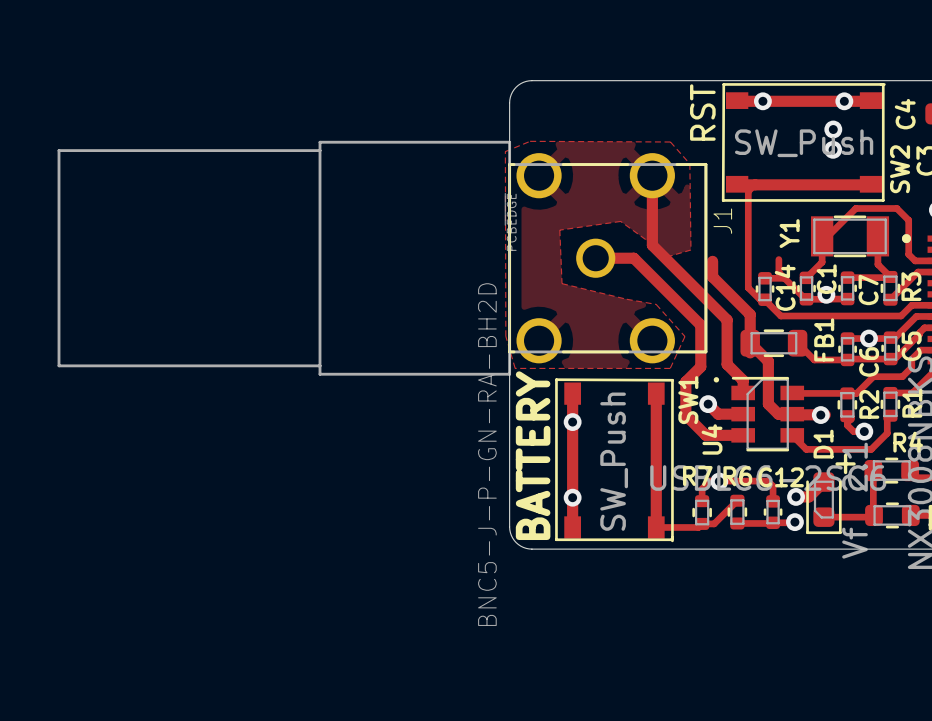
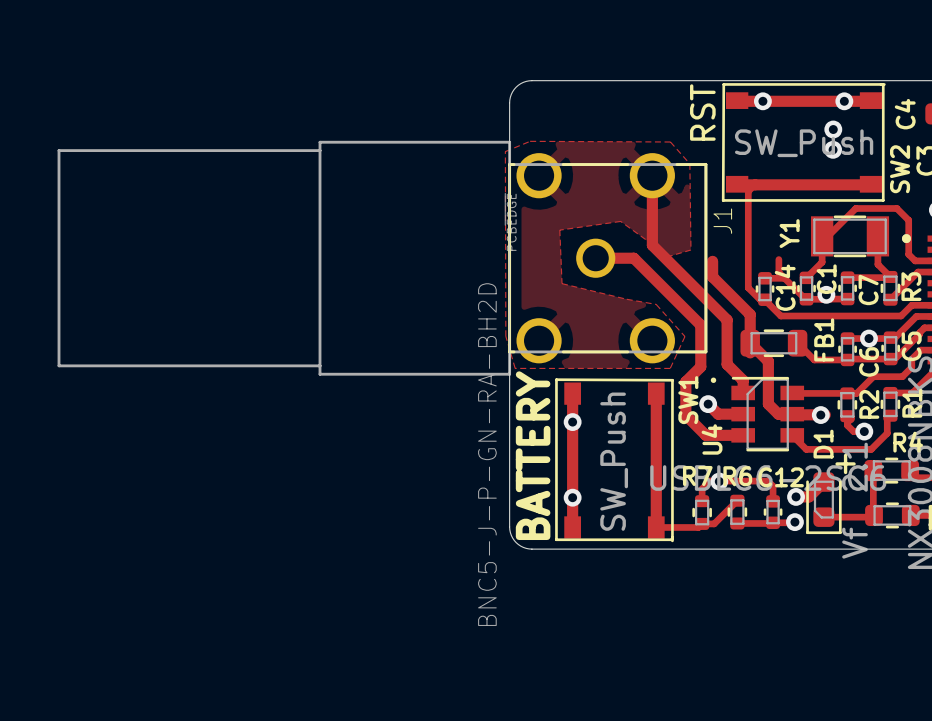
U4 footprint: [731, 376, 805, 452] -> [710, 376, 805, 452]
drawing: [713, 377, 720, 383] -> none

